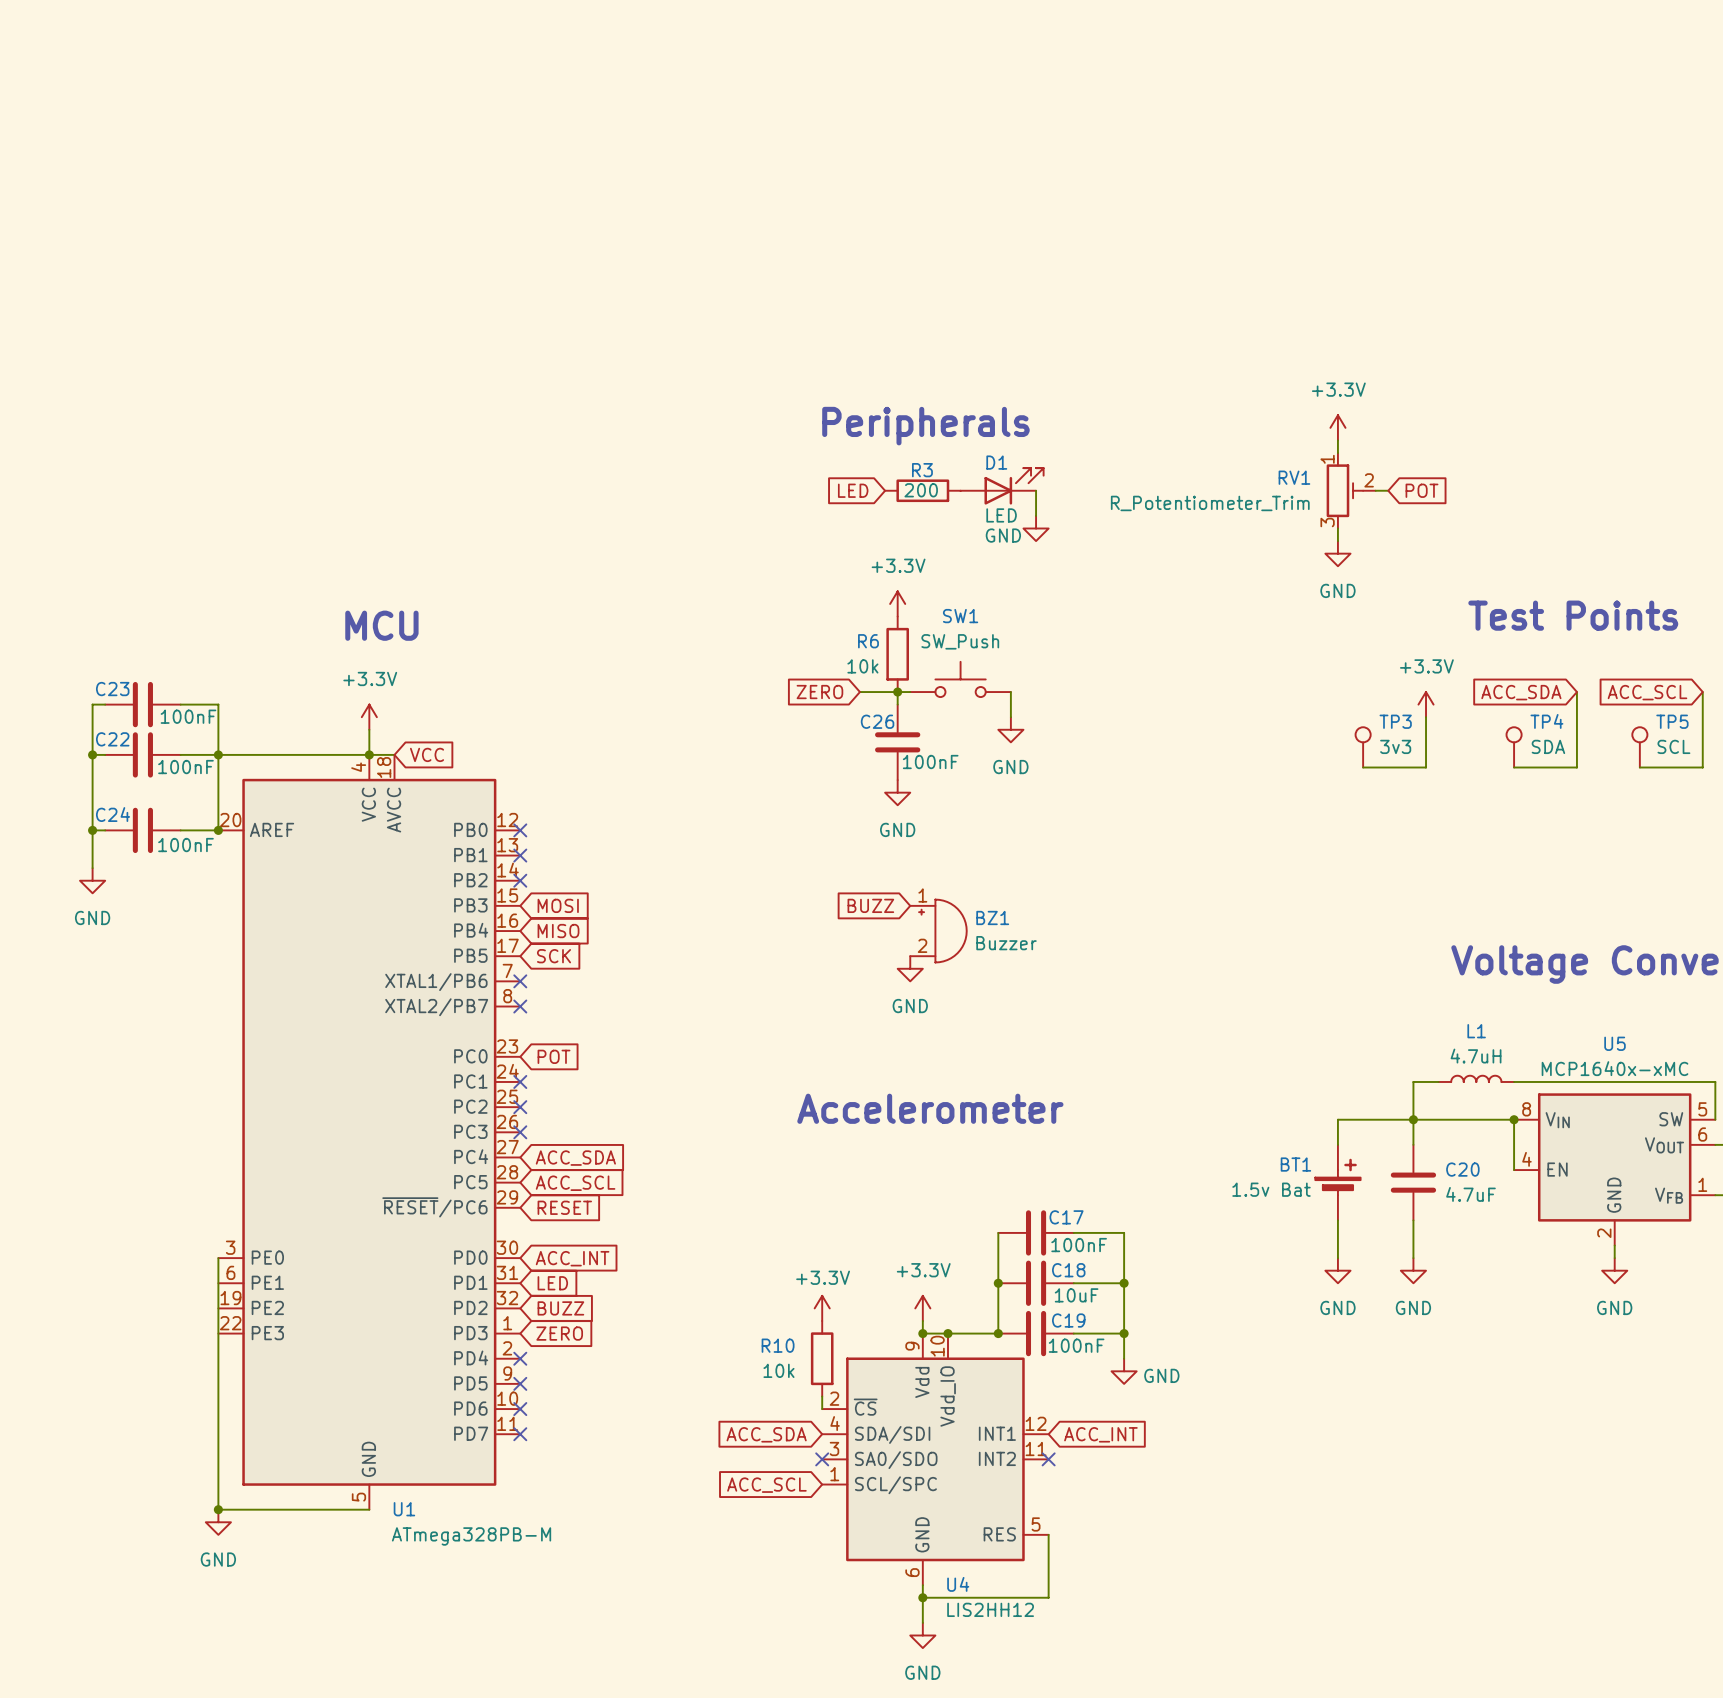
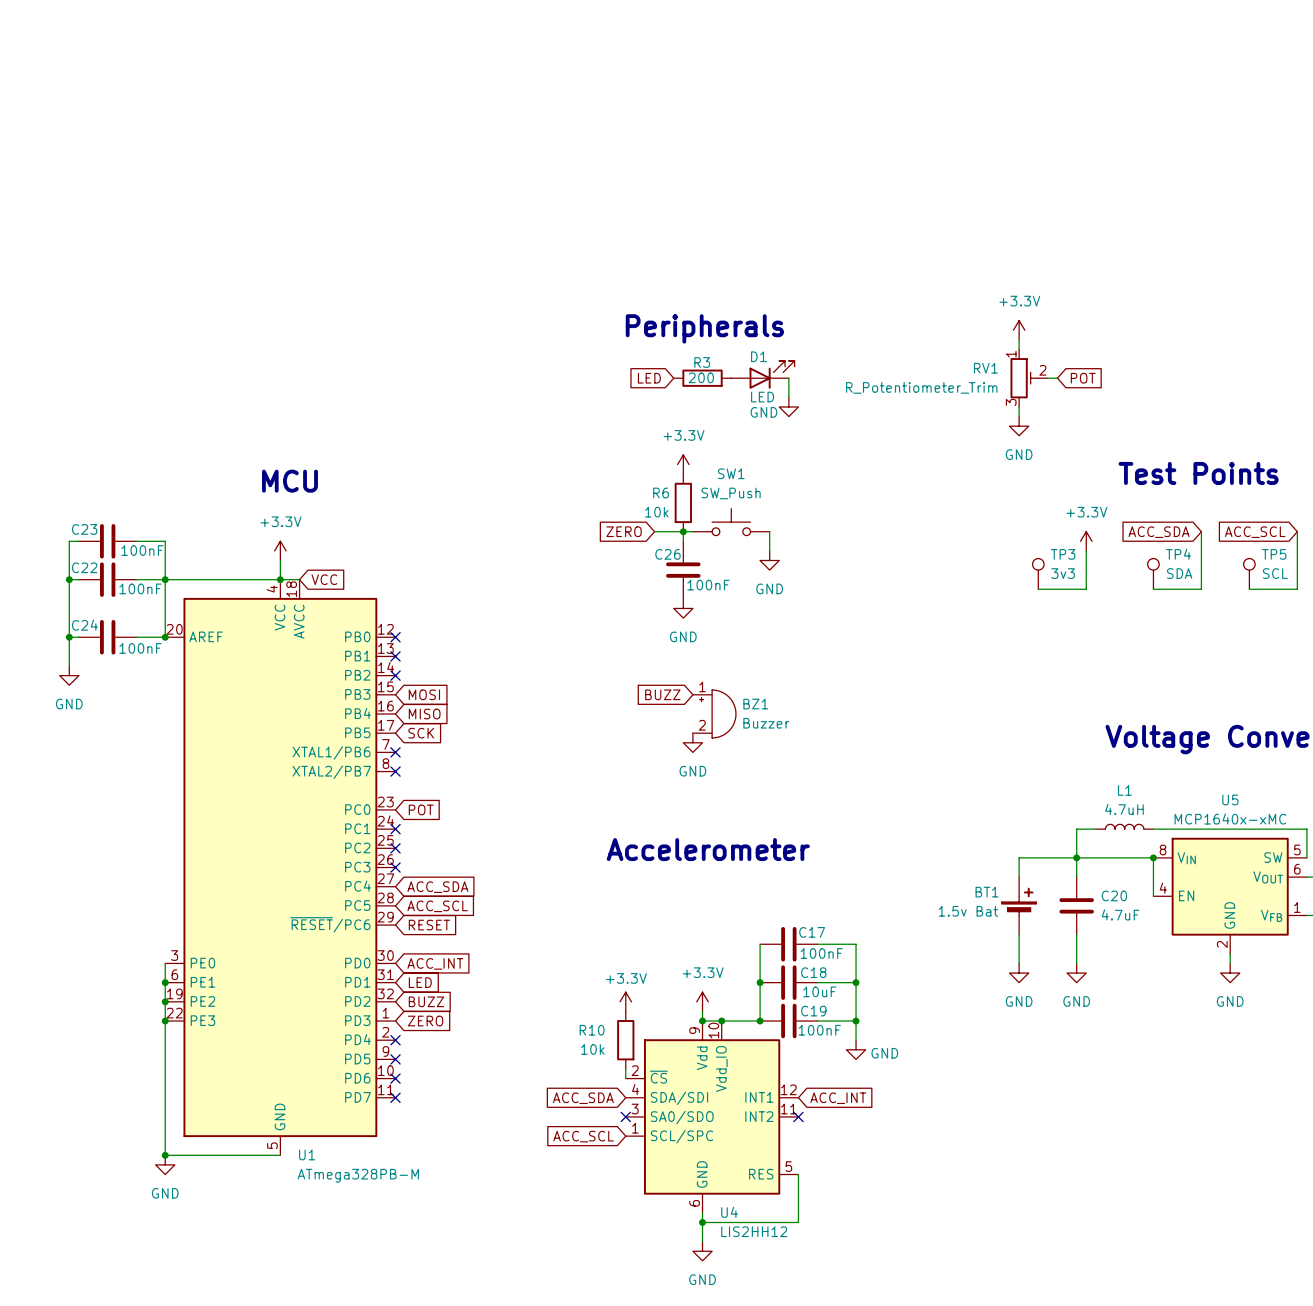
junction: none -> (165, 982)
junction: none -> (165, 1001)
junction: none -> (165, 1021)

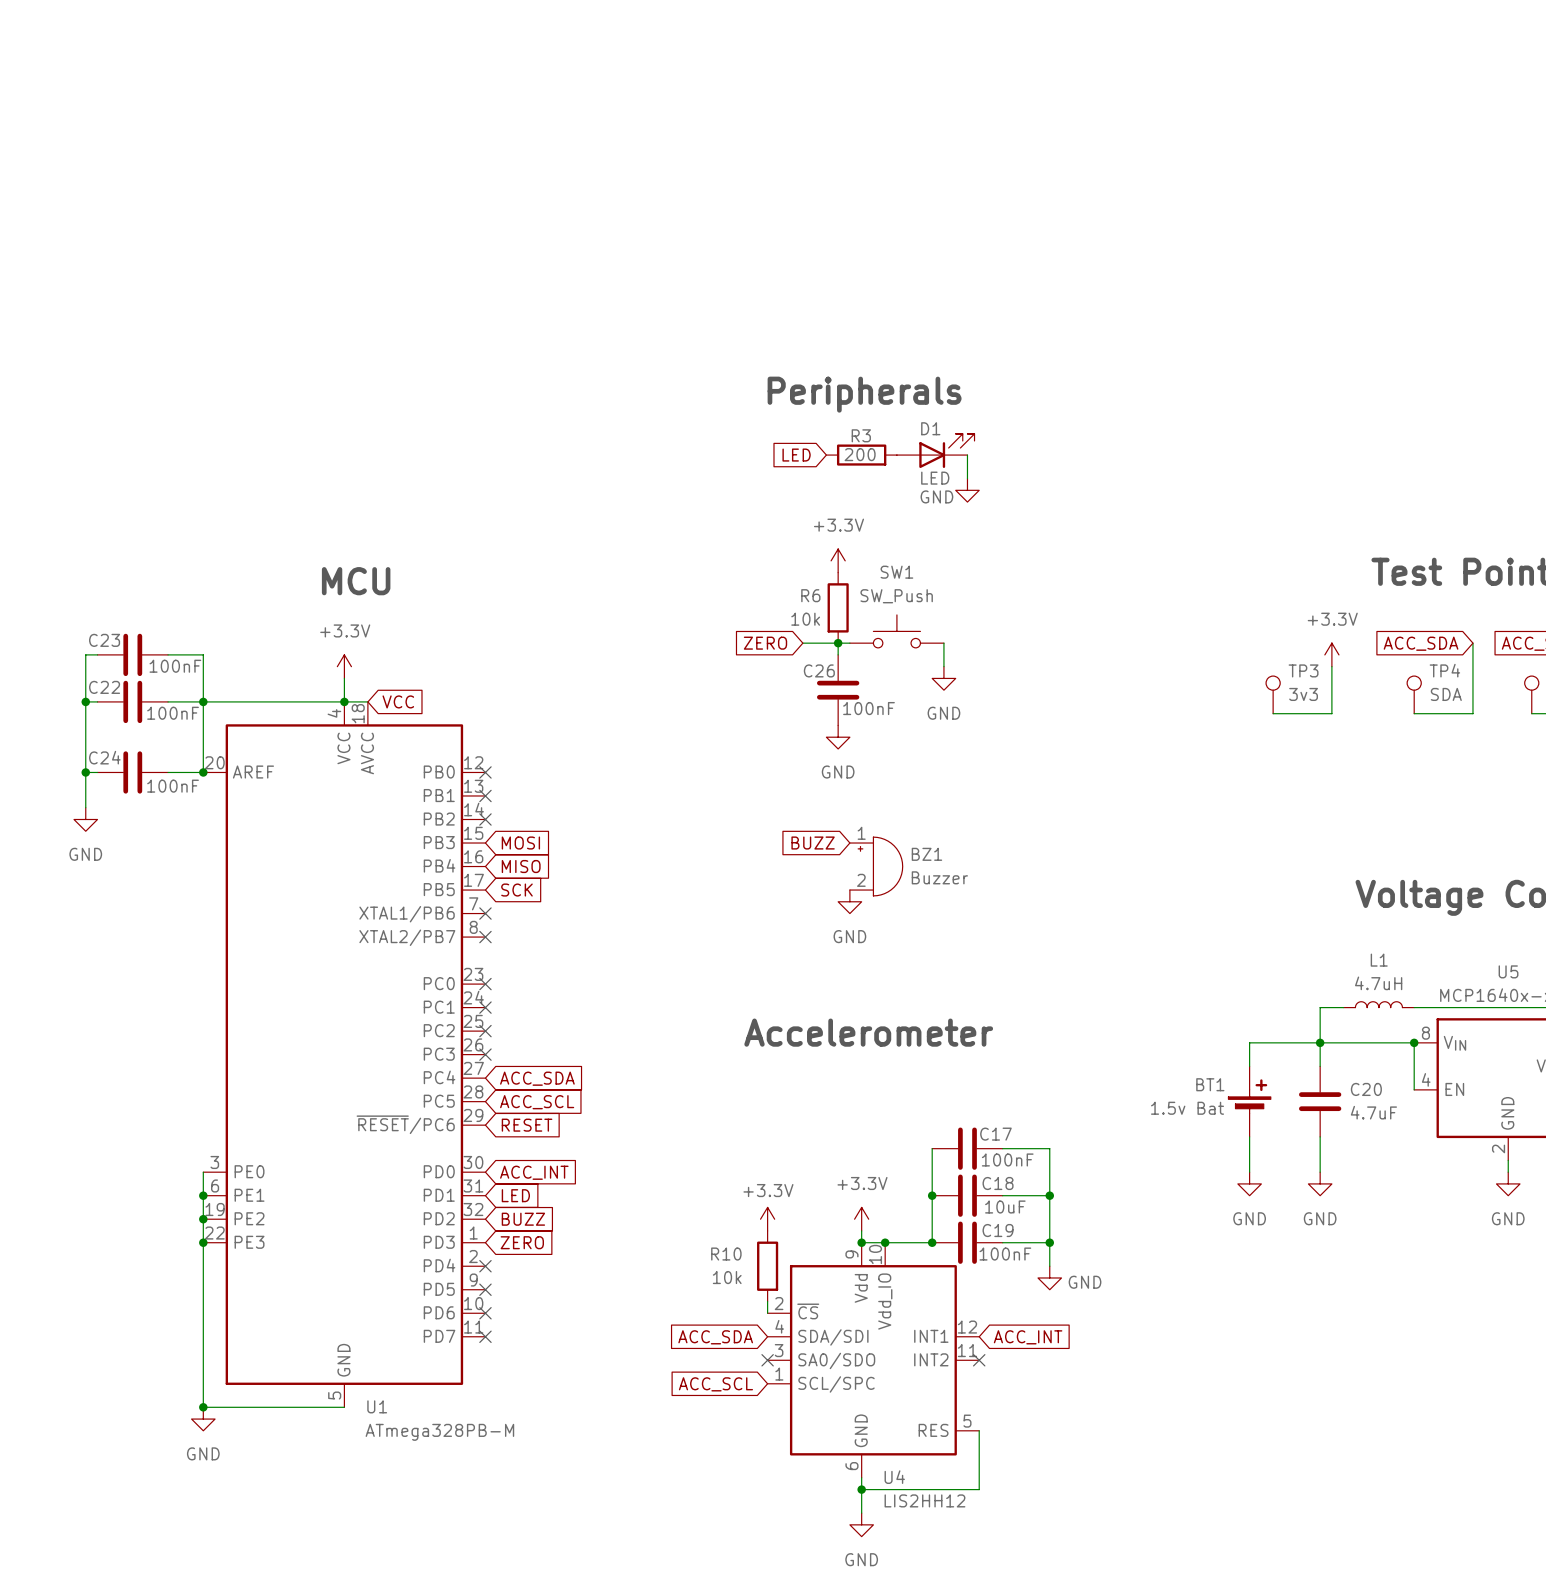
power symbol: +3.3V (1019, 330) -> none
wire: (1019, 339) (1019, 349) -> none
RV1: R_Potentiometer_Trim (1029, 378) -> none
wire: (1047, 378) (1057, 378) -> none
global label: POT (1083, 378) -> none
wire: (1019, 406) (1019, 416) -> none
power symbol: GND (1019, 426) -> none
no-connect mark: none -> (485, 984)
global label: POT (421, 809) -> none

